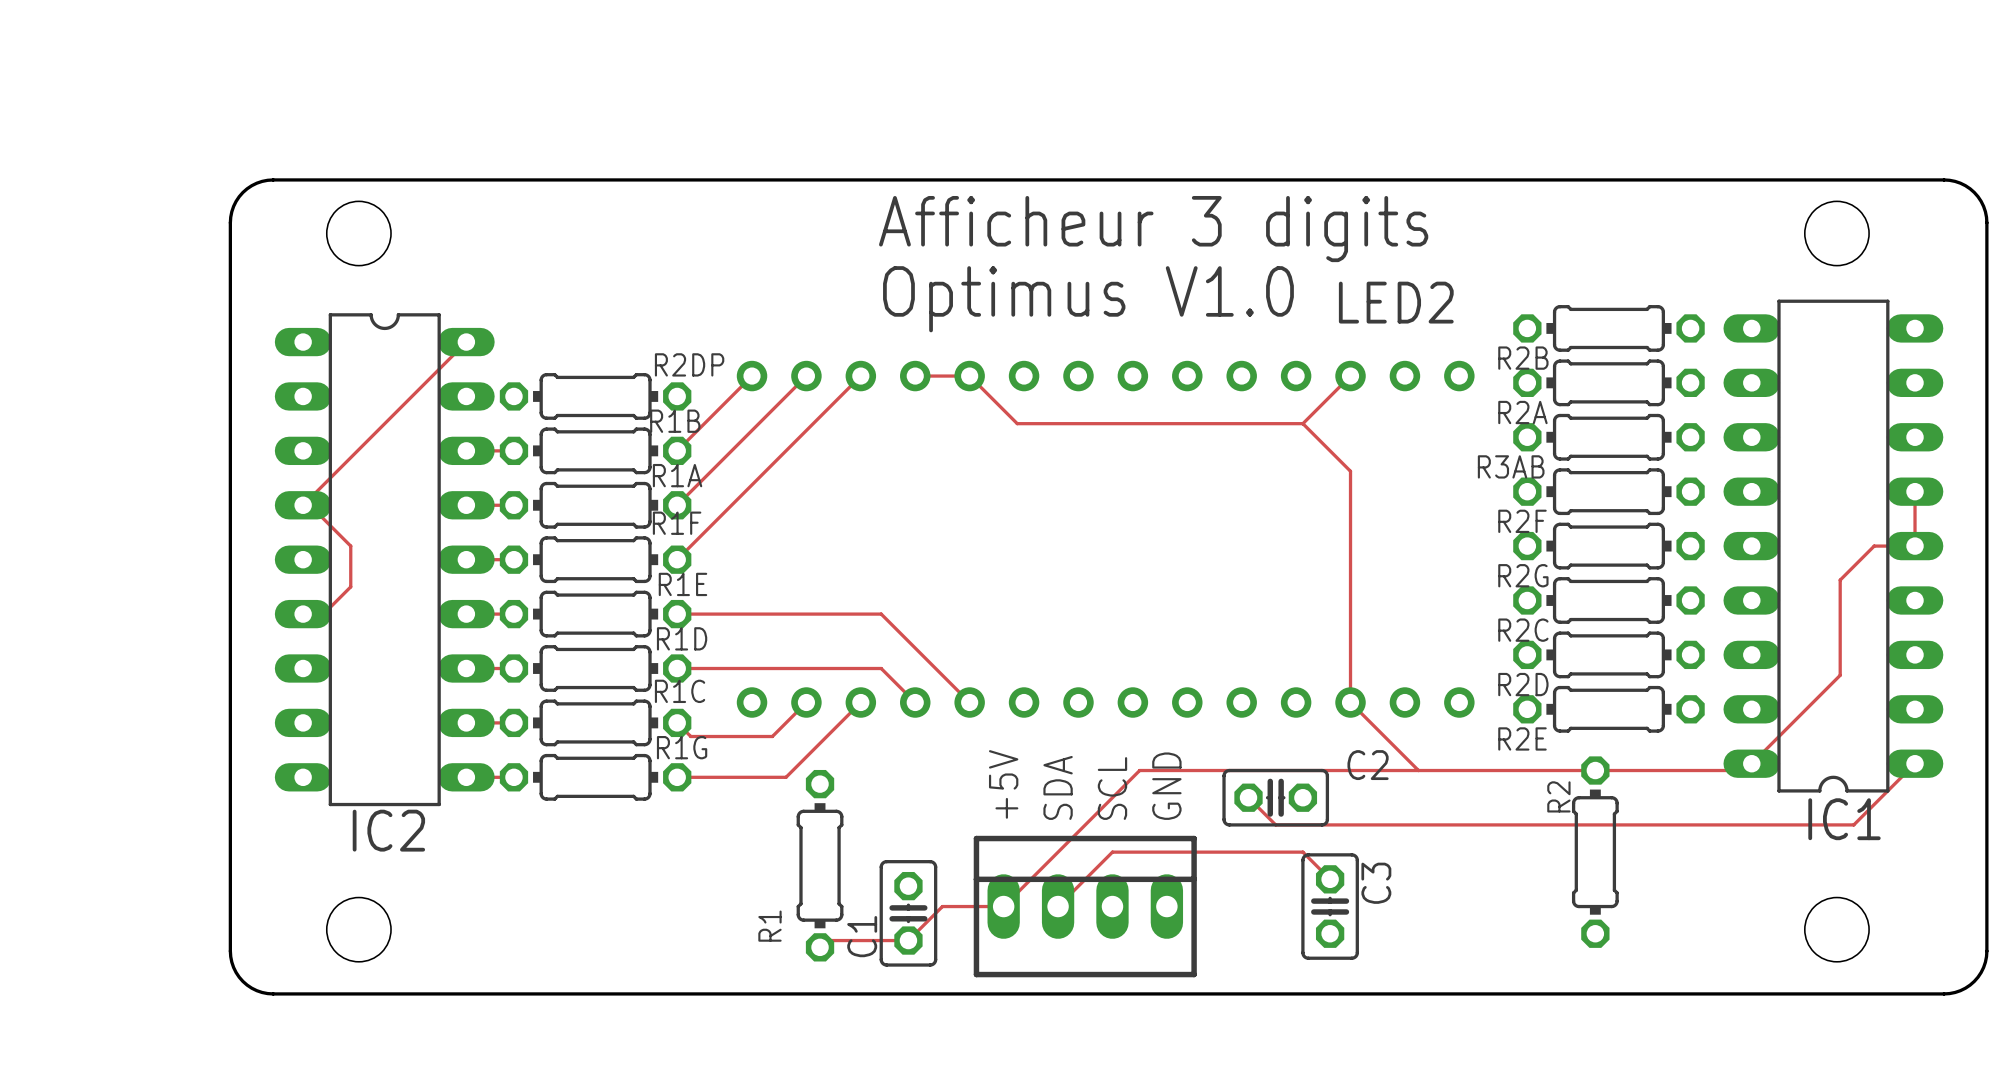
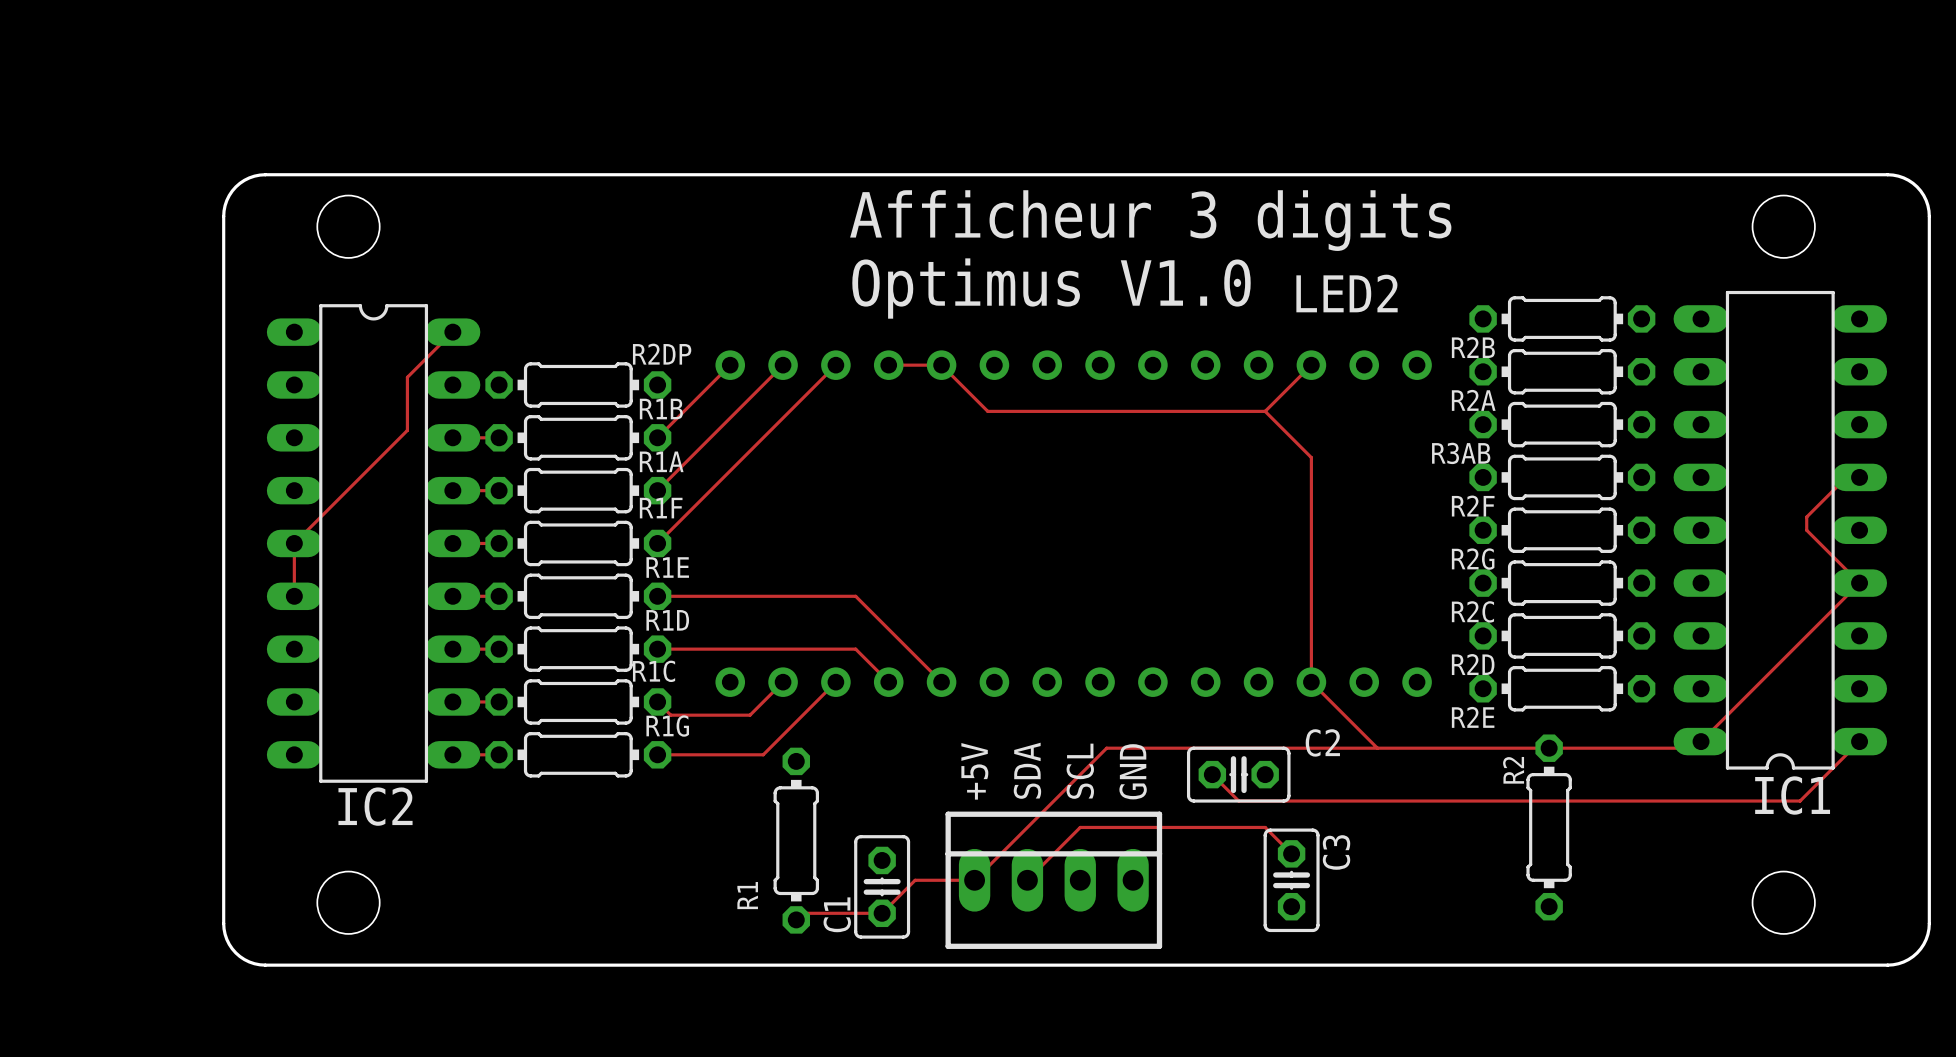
track: (466, 342) (303, 505) (309, 505) (350, 546) (350, 586) (323, 614) (303, 614) -> (452, 332) (407, 377) (407, 430) (294, 543) (294, 596)
track: (1915, 491) (1915, 546) (1874, 546) (1840, 580) (1840, 675) -> (1859, 477) (1846, 477) (1806, 517) (1806, 530) (1859, 583) (1786, 655)

